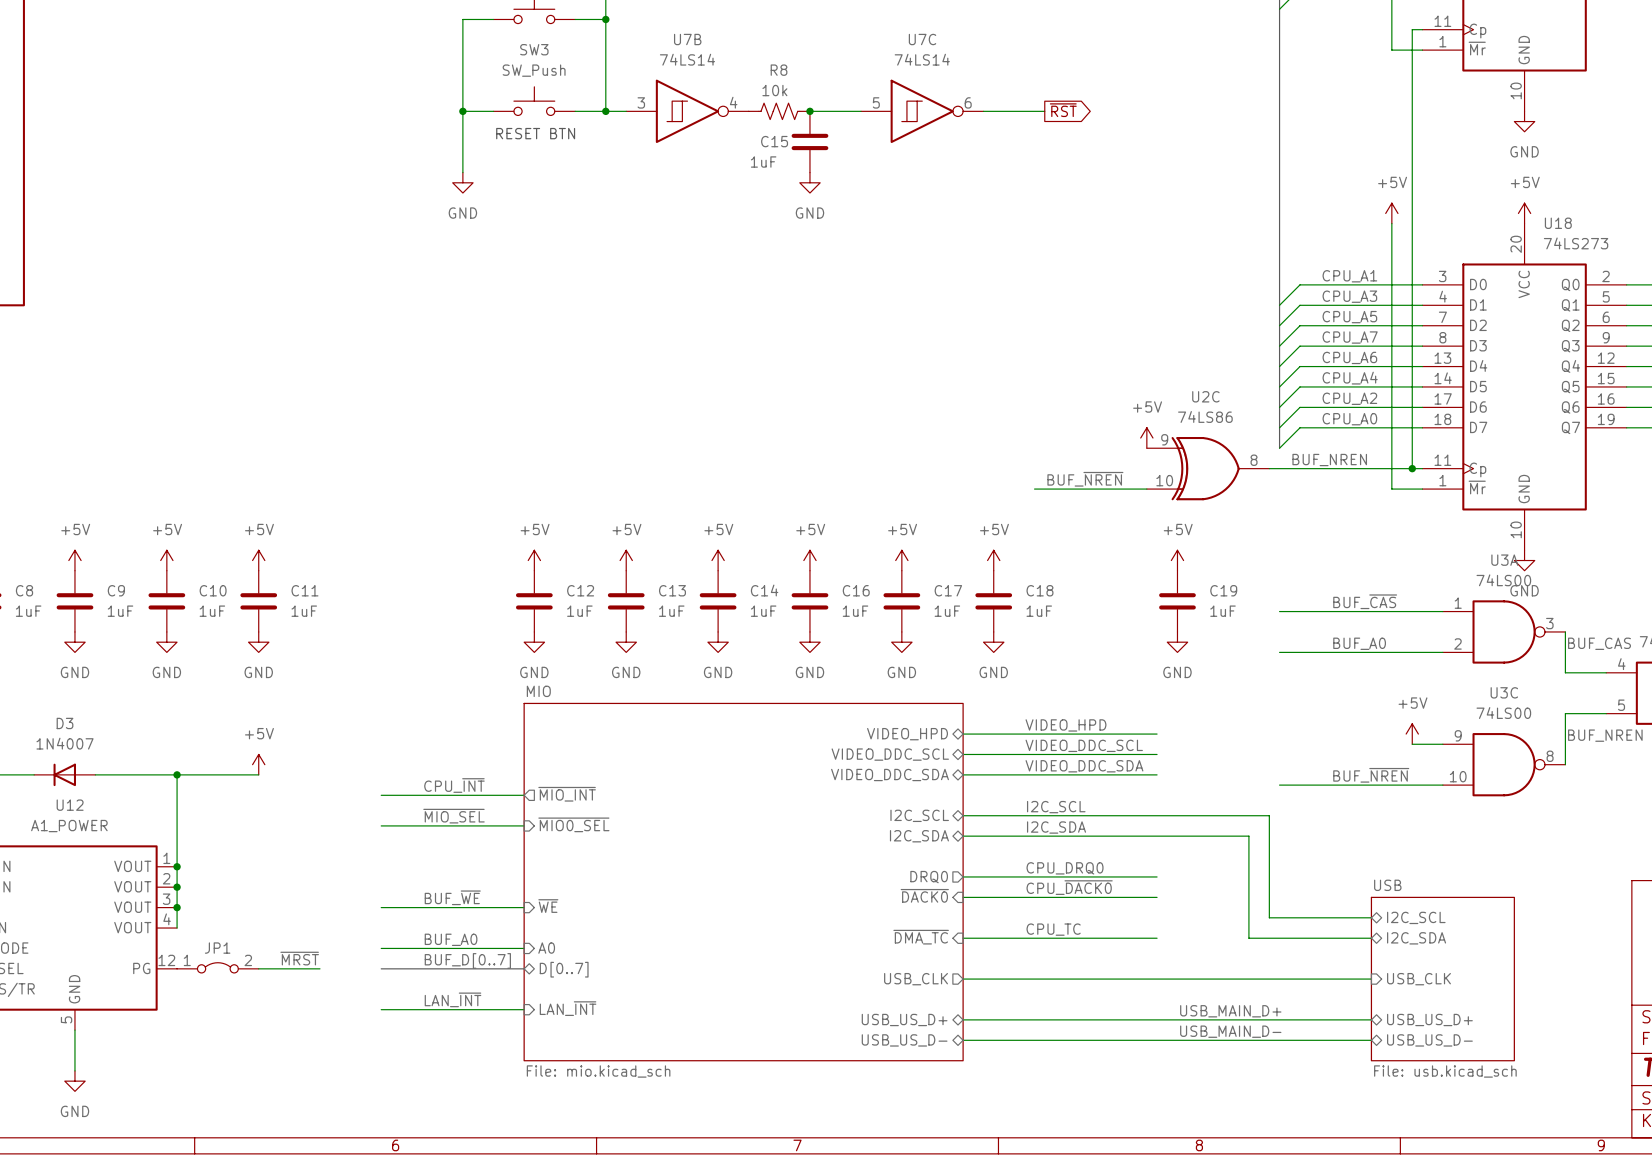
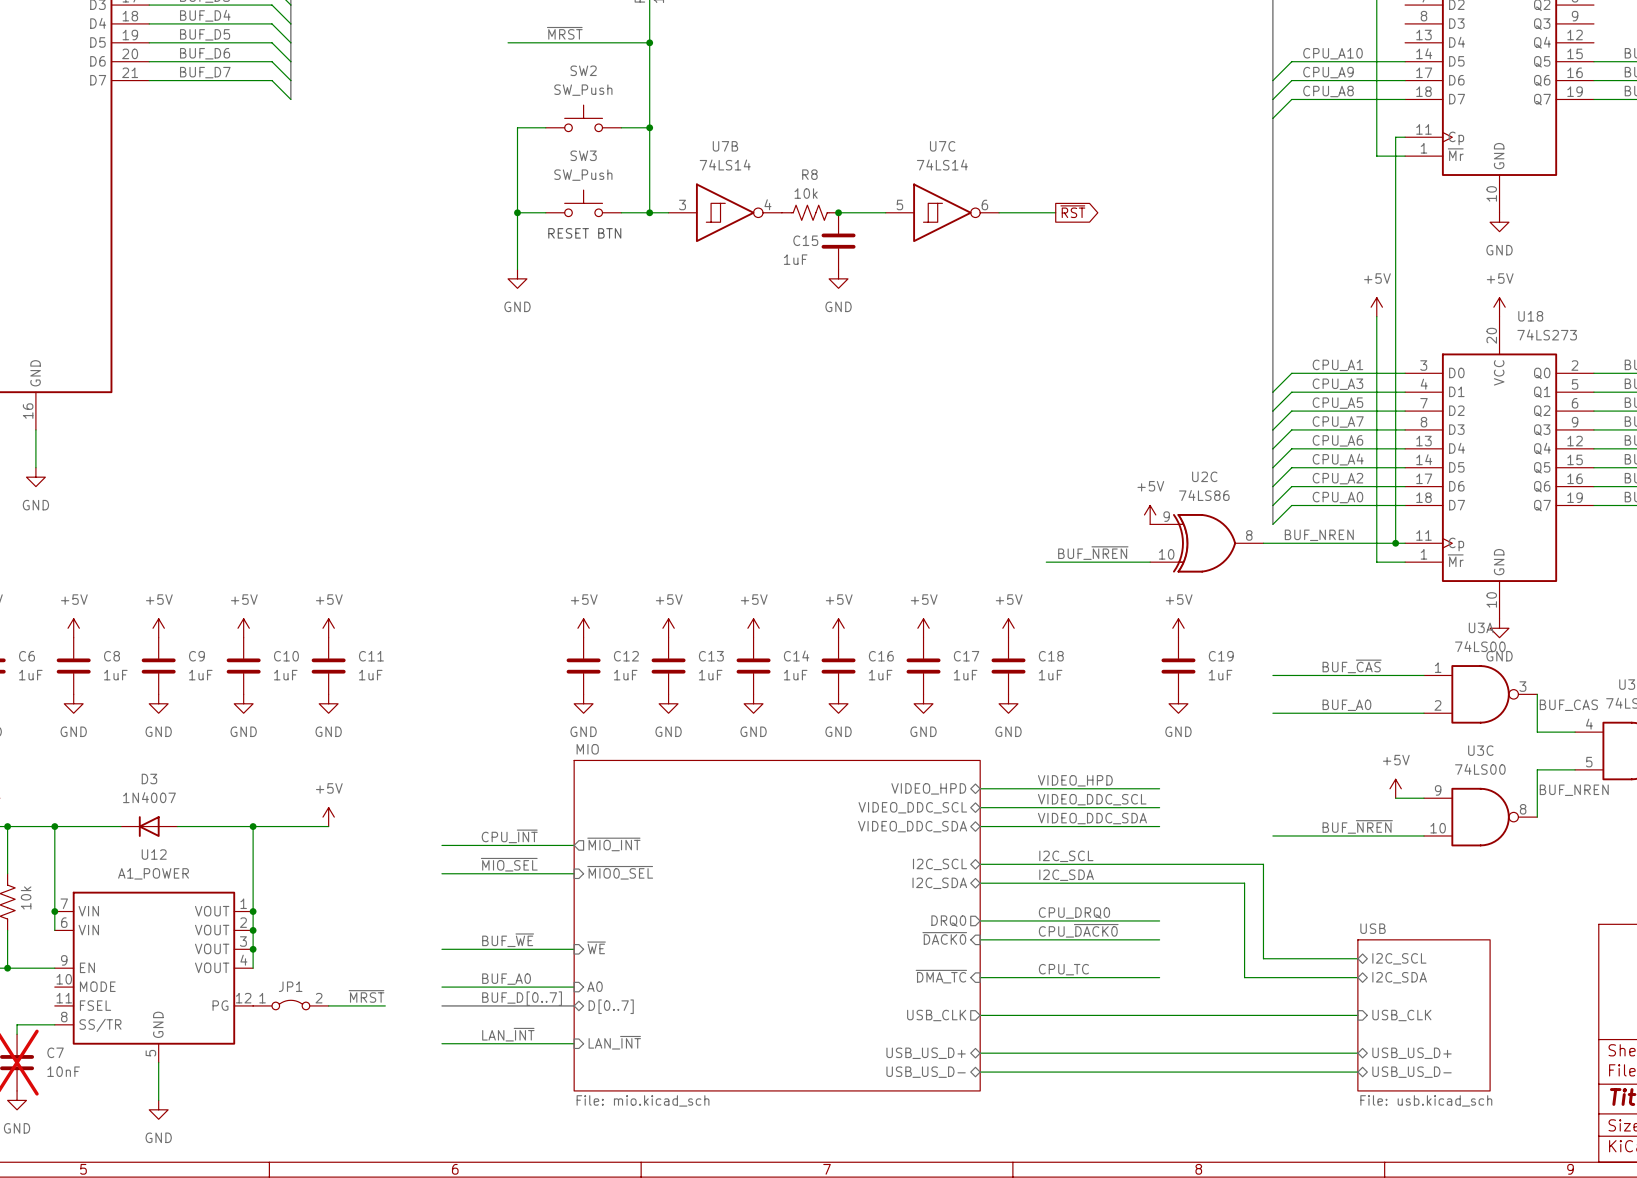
label: USB_MAIN_D+ (1230, 1011) -> none
label: USB_MAIN_D- (1230, 1031) -> none

